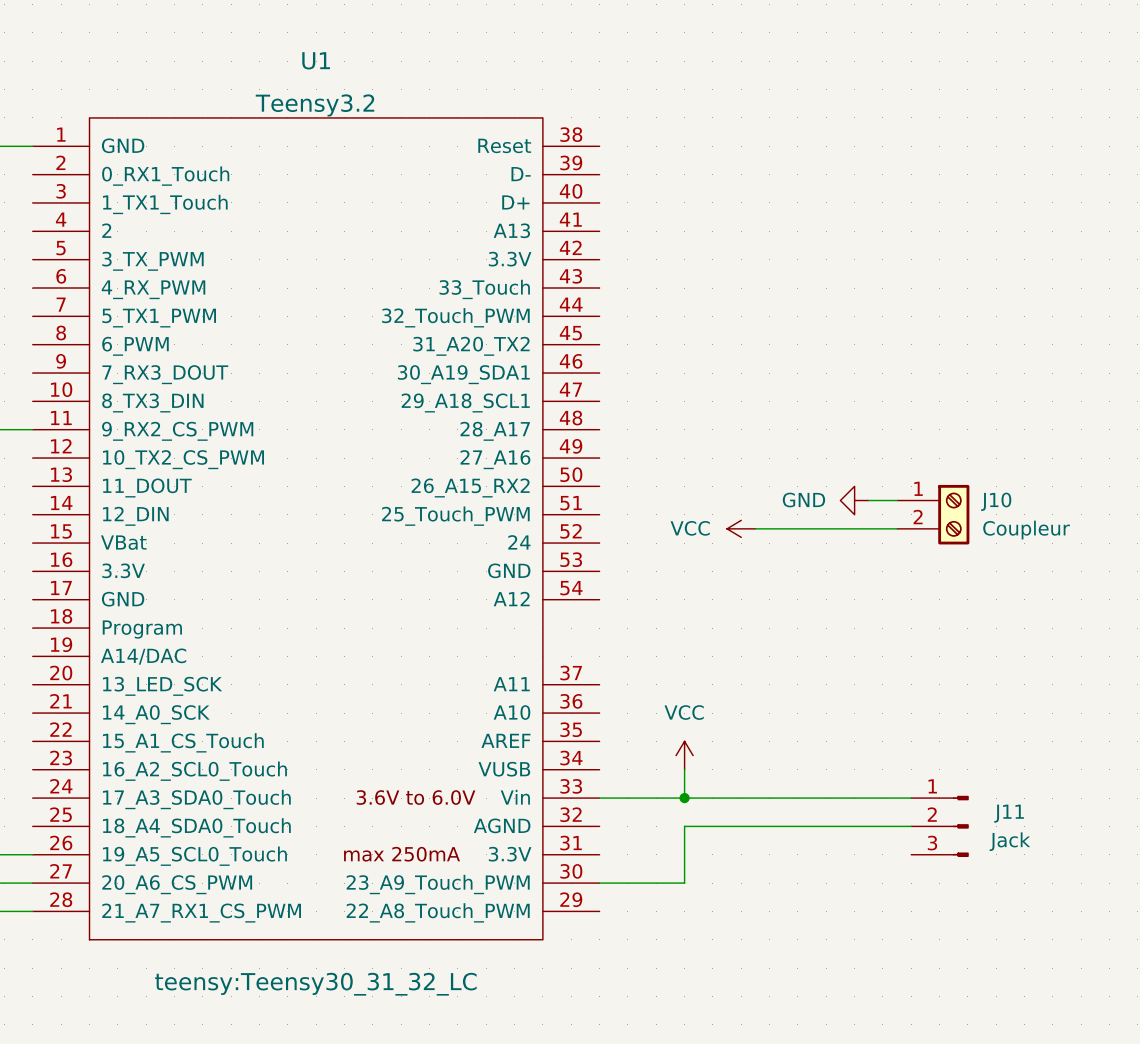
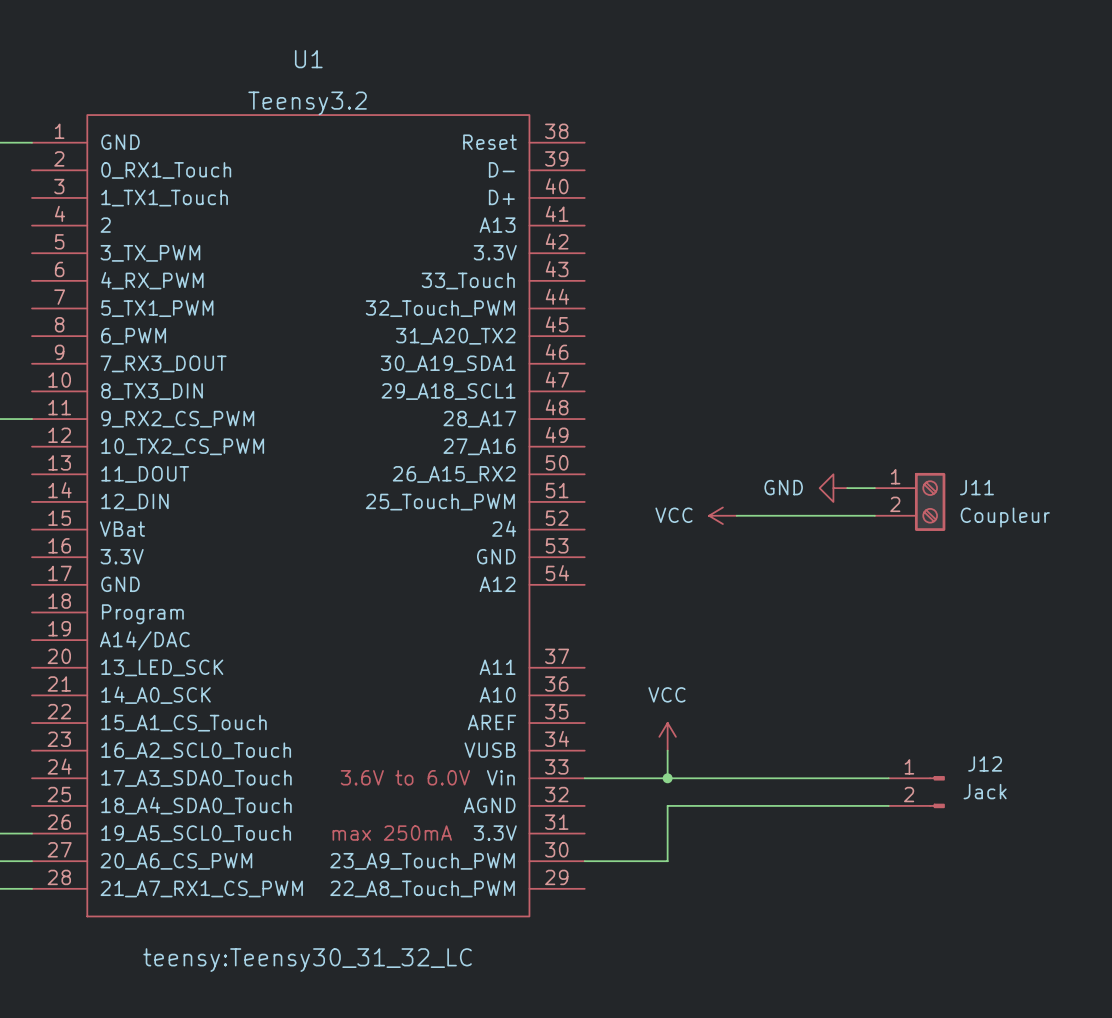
J10 name: J10 (996, 501) -> J11 (976, 487)
J12: none -> Jack (916, 792)
J11: Jack (940, 826) -> none

